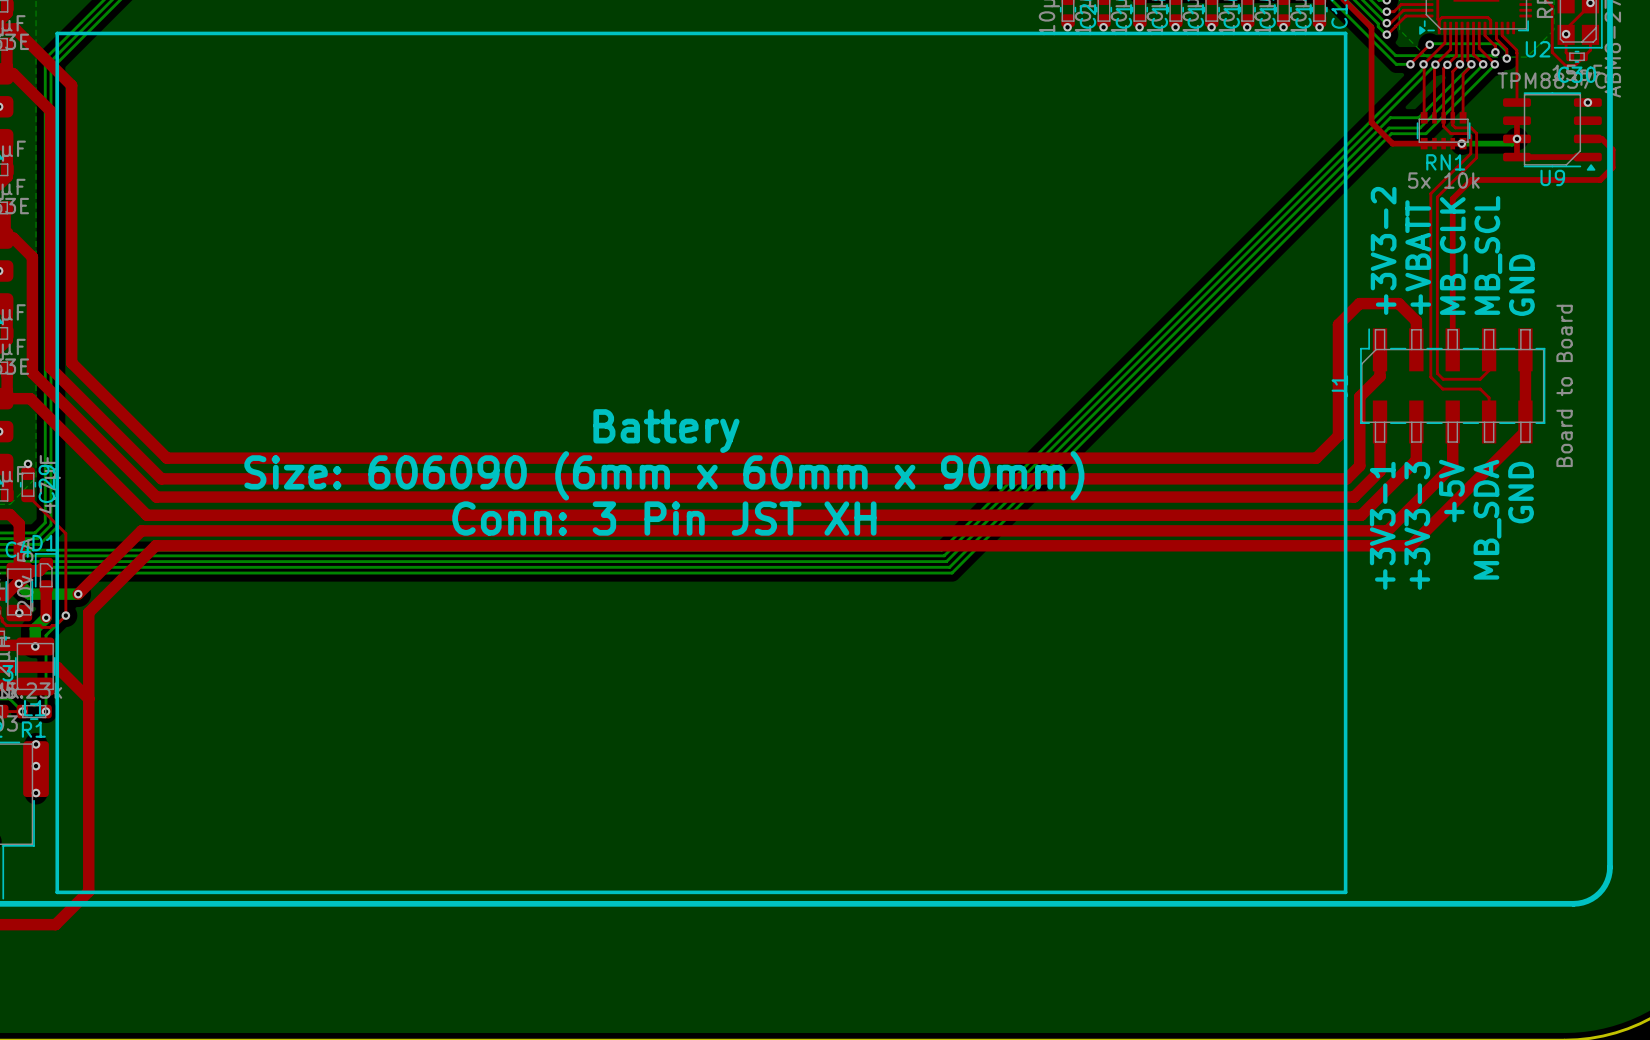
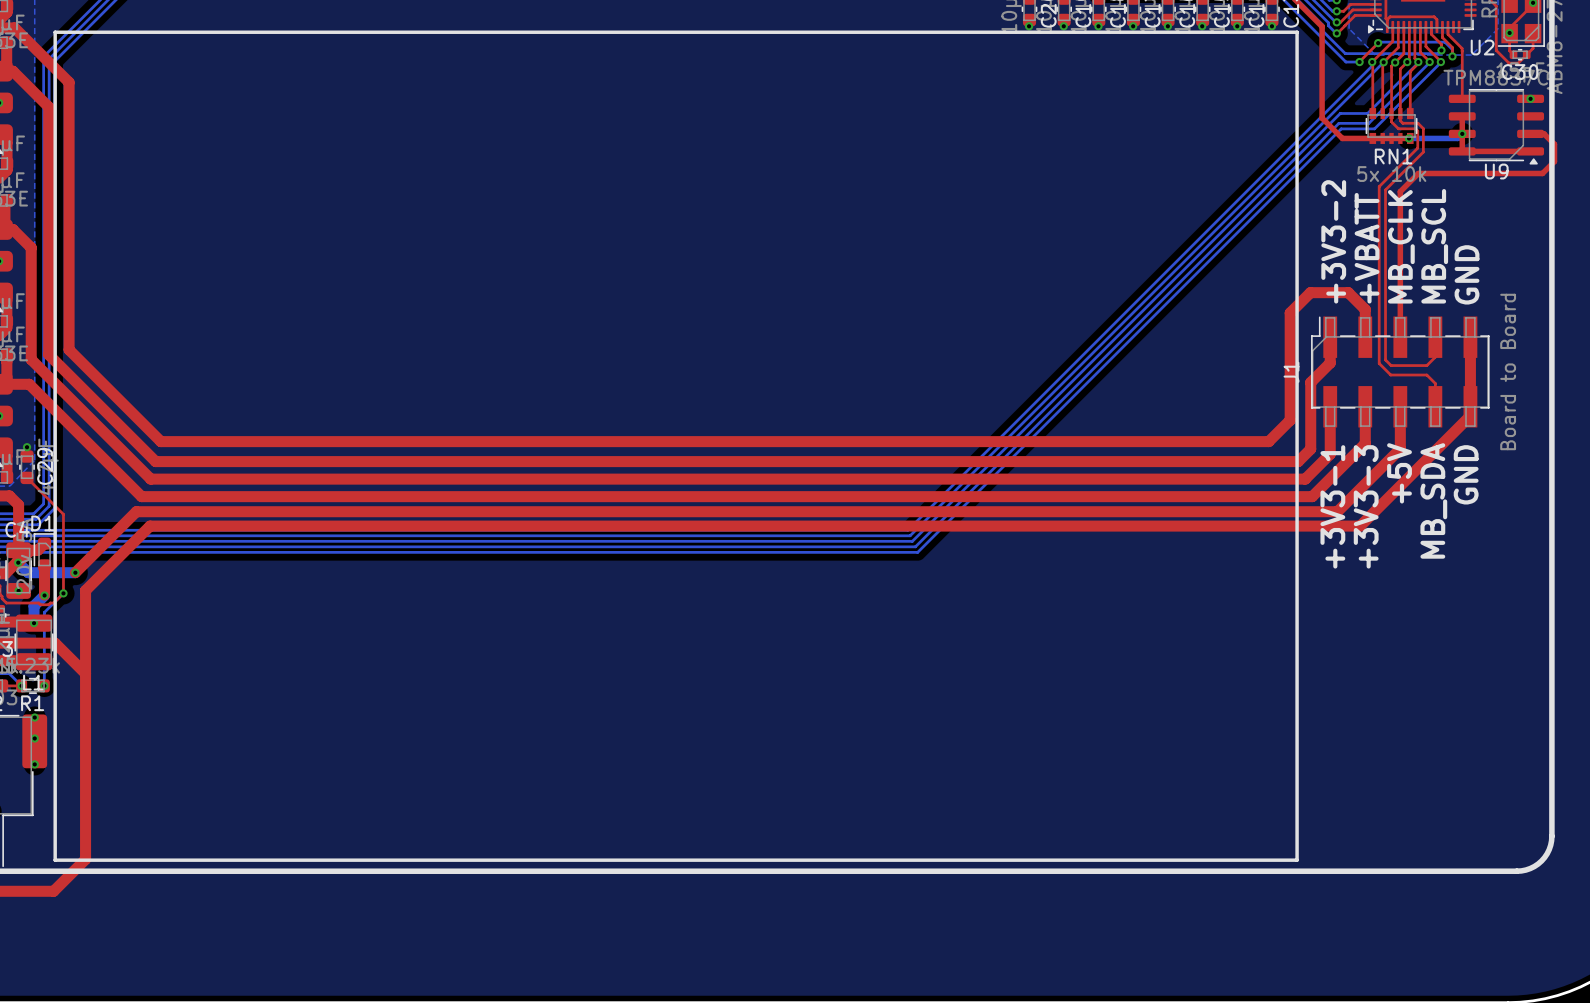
text: Battery (666, 431) -> none
text: Size: 606090 (6mm x 60mm x 90mm) (664, 475) -> none
text: Conn: 3 Pin JST XH (664, 518) -> none

